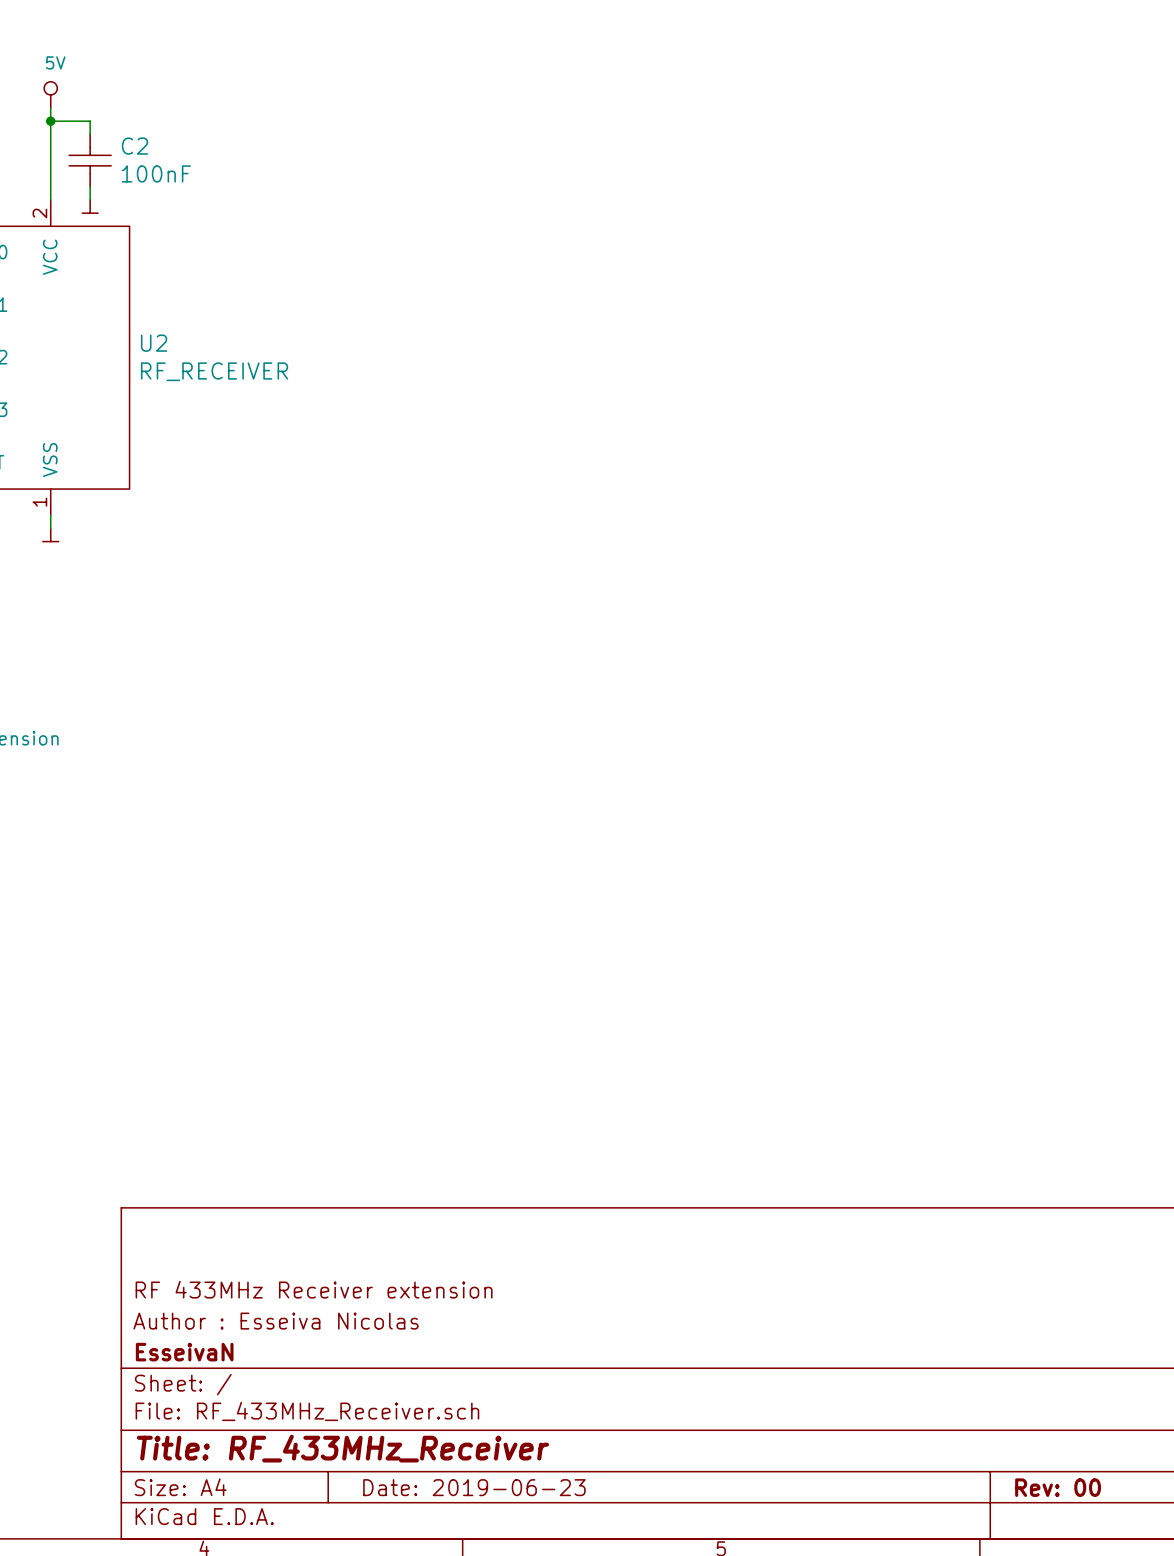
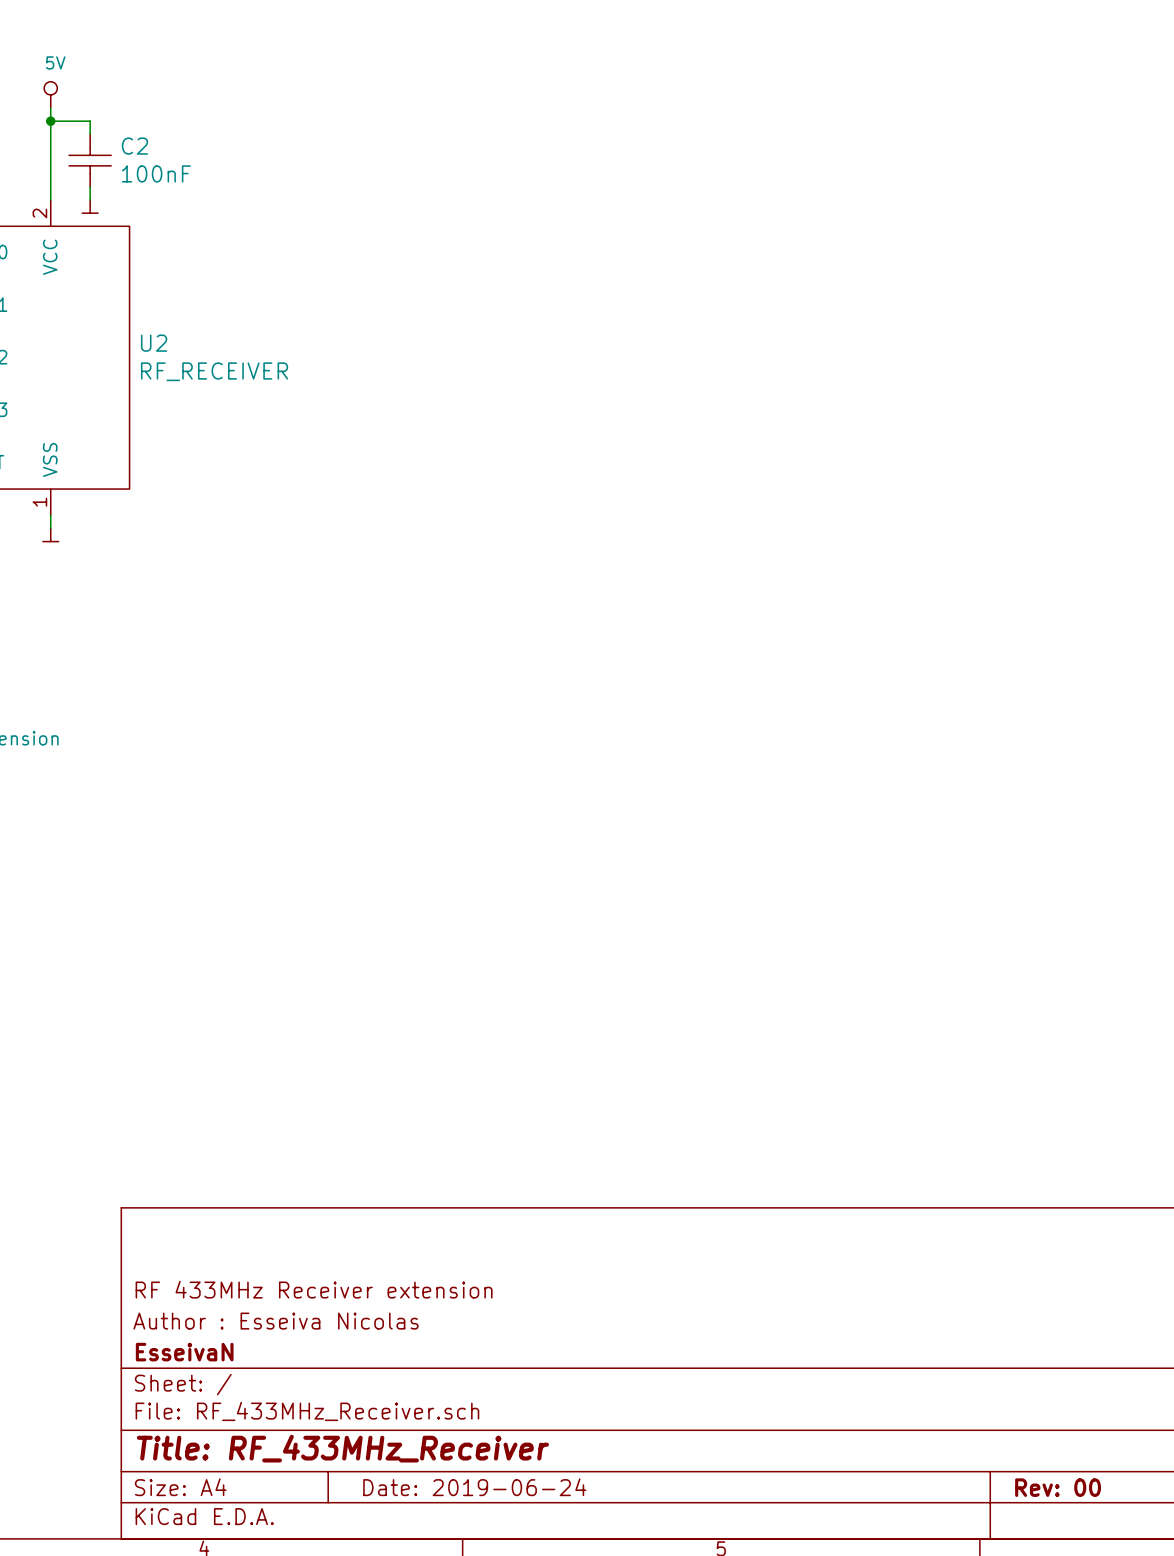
title block: Date: 2019-06-23 (474, 1487) -> Date: 2019-06-24 (474, 1487)

